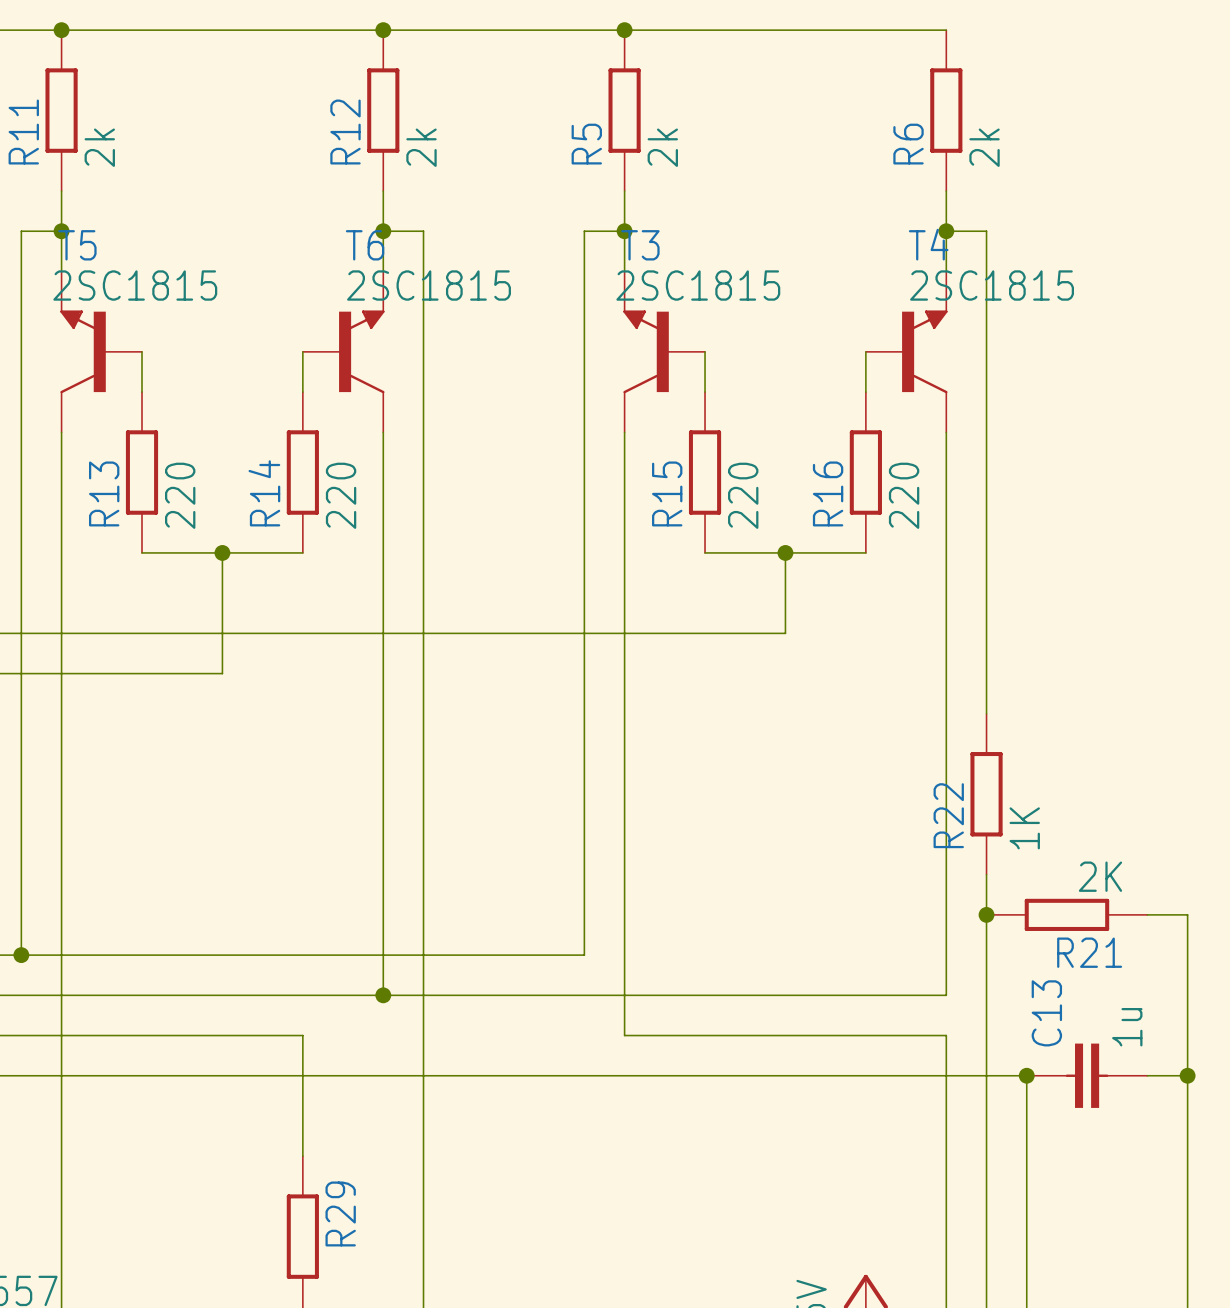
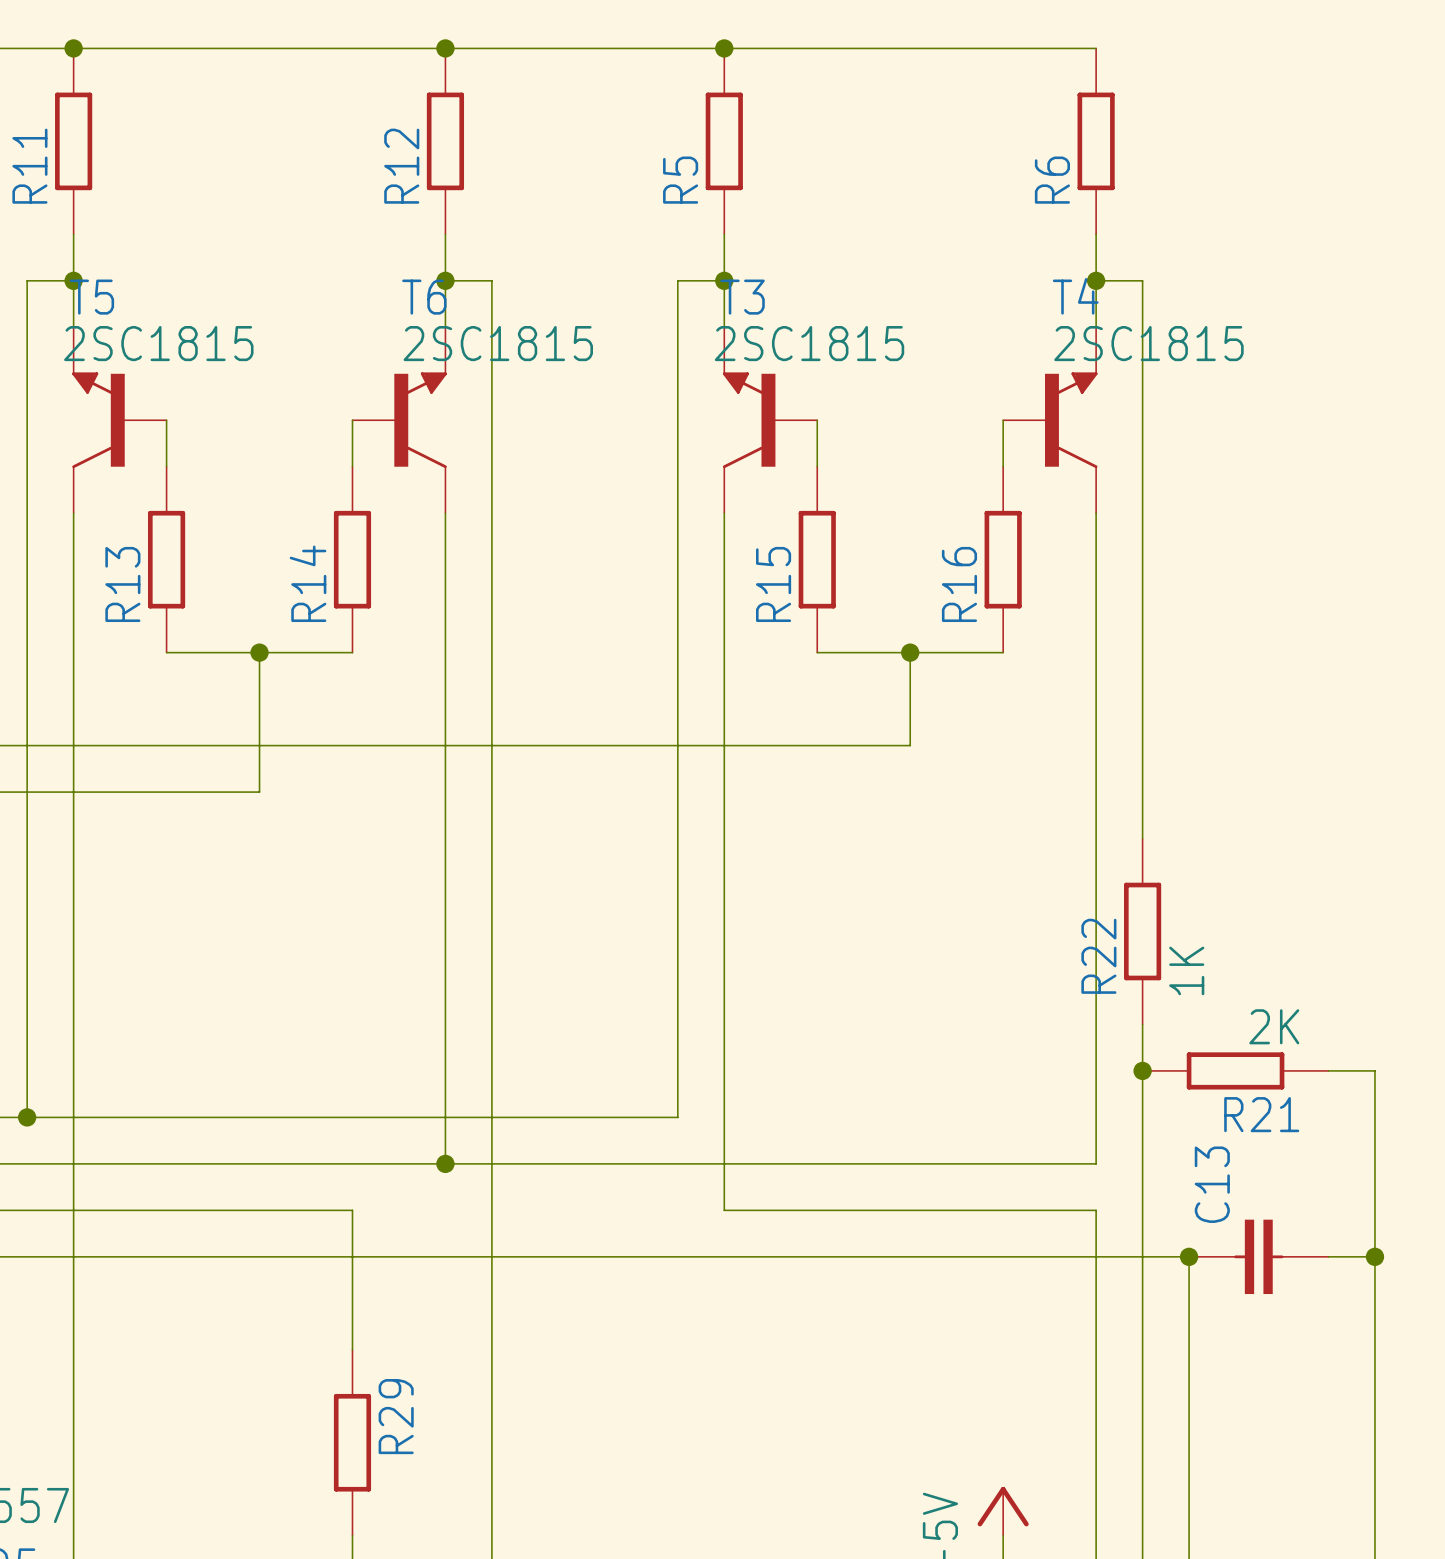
R11 value: 2k (99, 147) -> none
R12 value: 2k (421, 147) -> none
R5 value: 2k (662, 147) -> none
R6 value: 2k (984, 147) -> none
R13 value: 220 (180, 495) -> none
R14 value: 220 (341, 495) -> none
R15 value: 220 (743, 495) -> none
R16 value: 220 (904, 495) -> none
C13 value: 1u (1127, 1027) -> none

